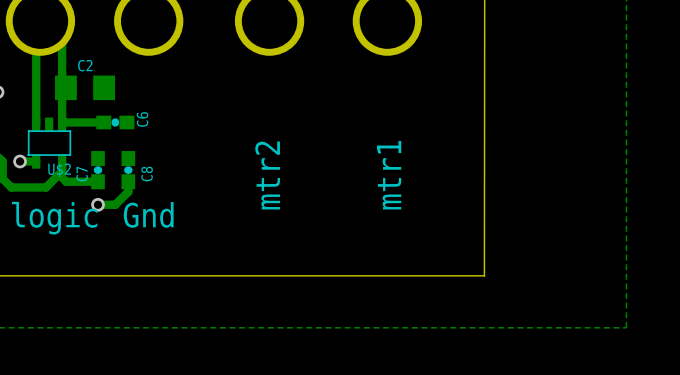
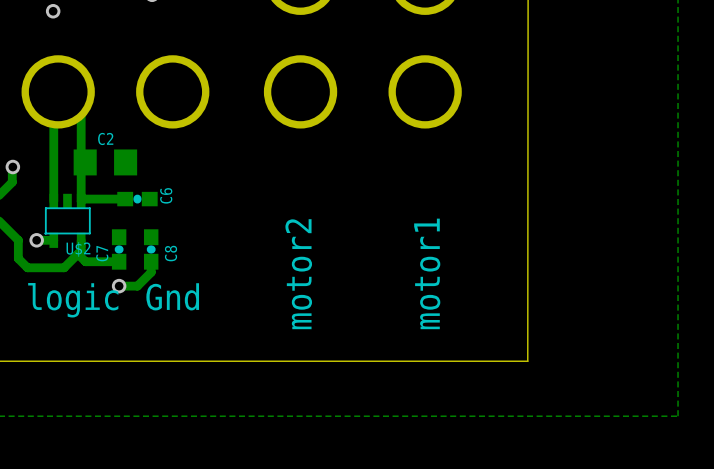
text: mtr2 (267, 175) -> motor2 (298, 274)
text: mtr1 (389, 175) -> motor1 (427, 273)

